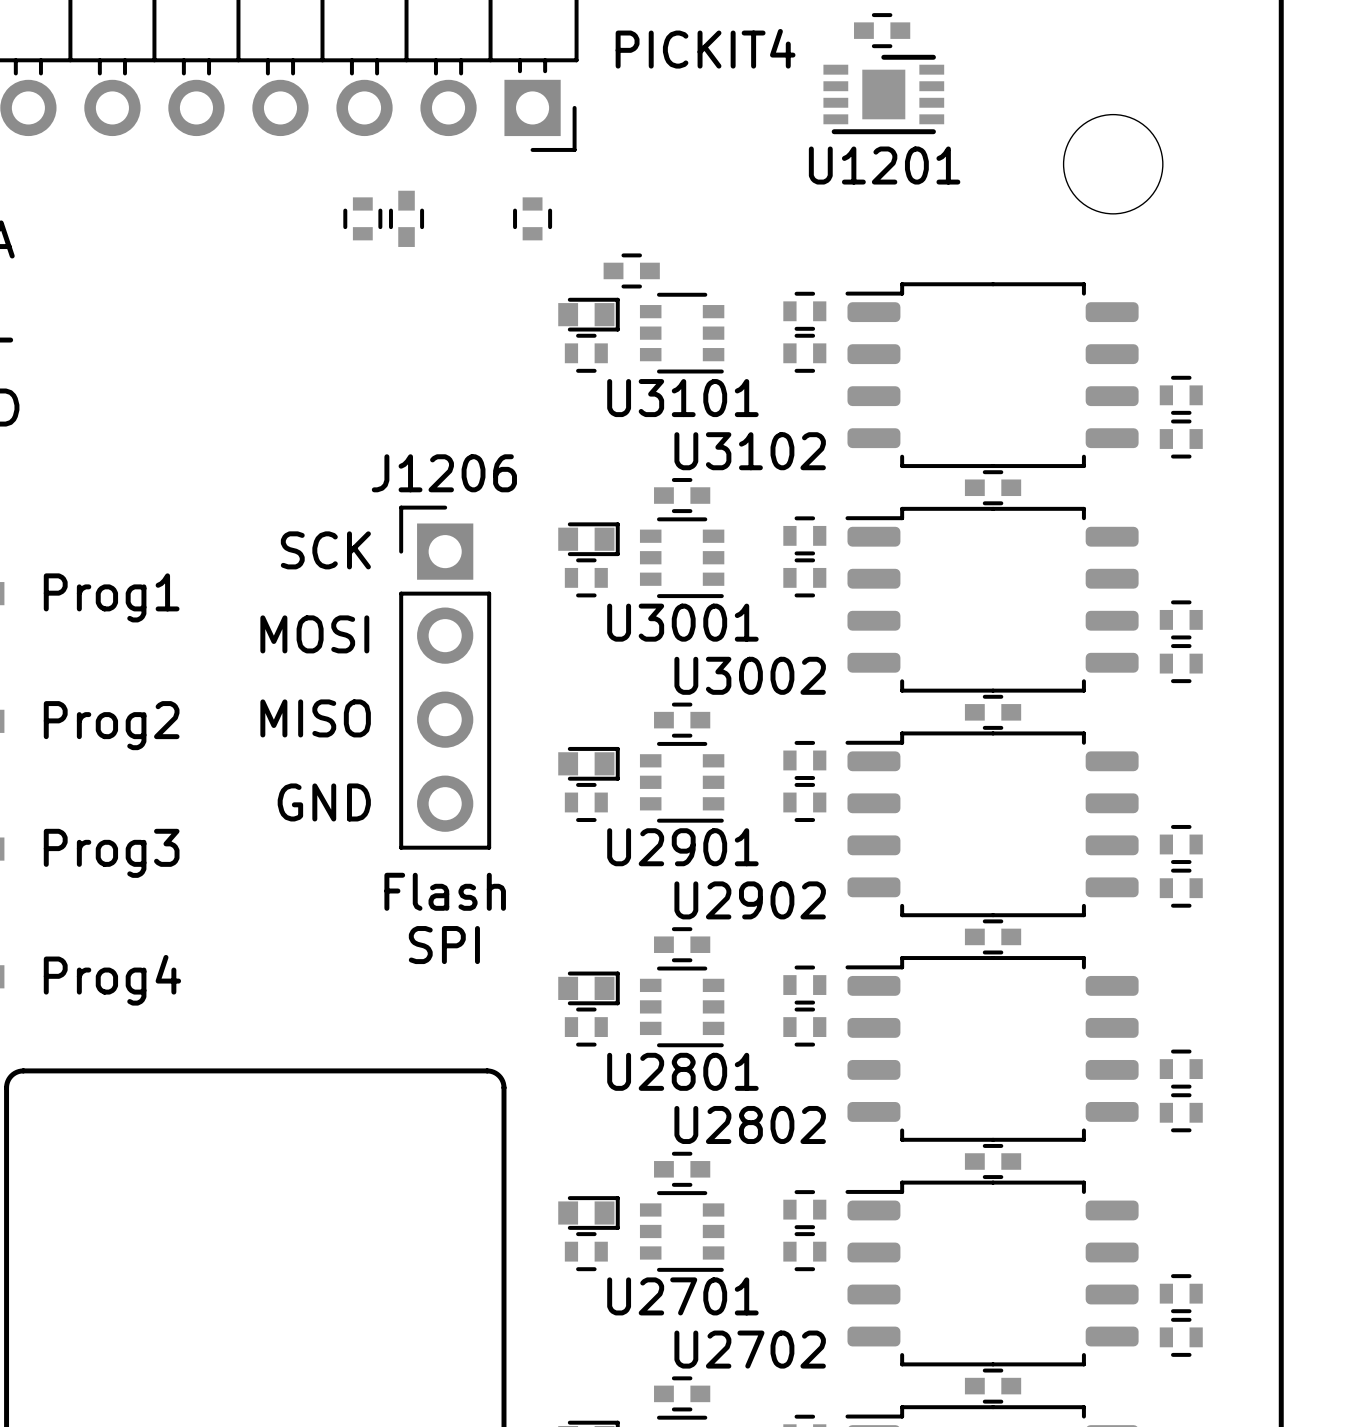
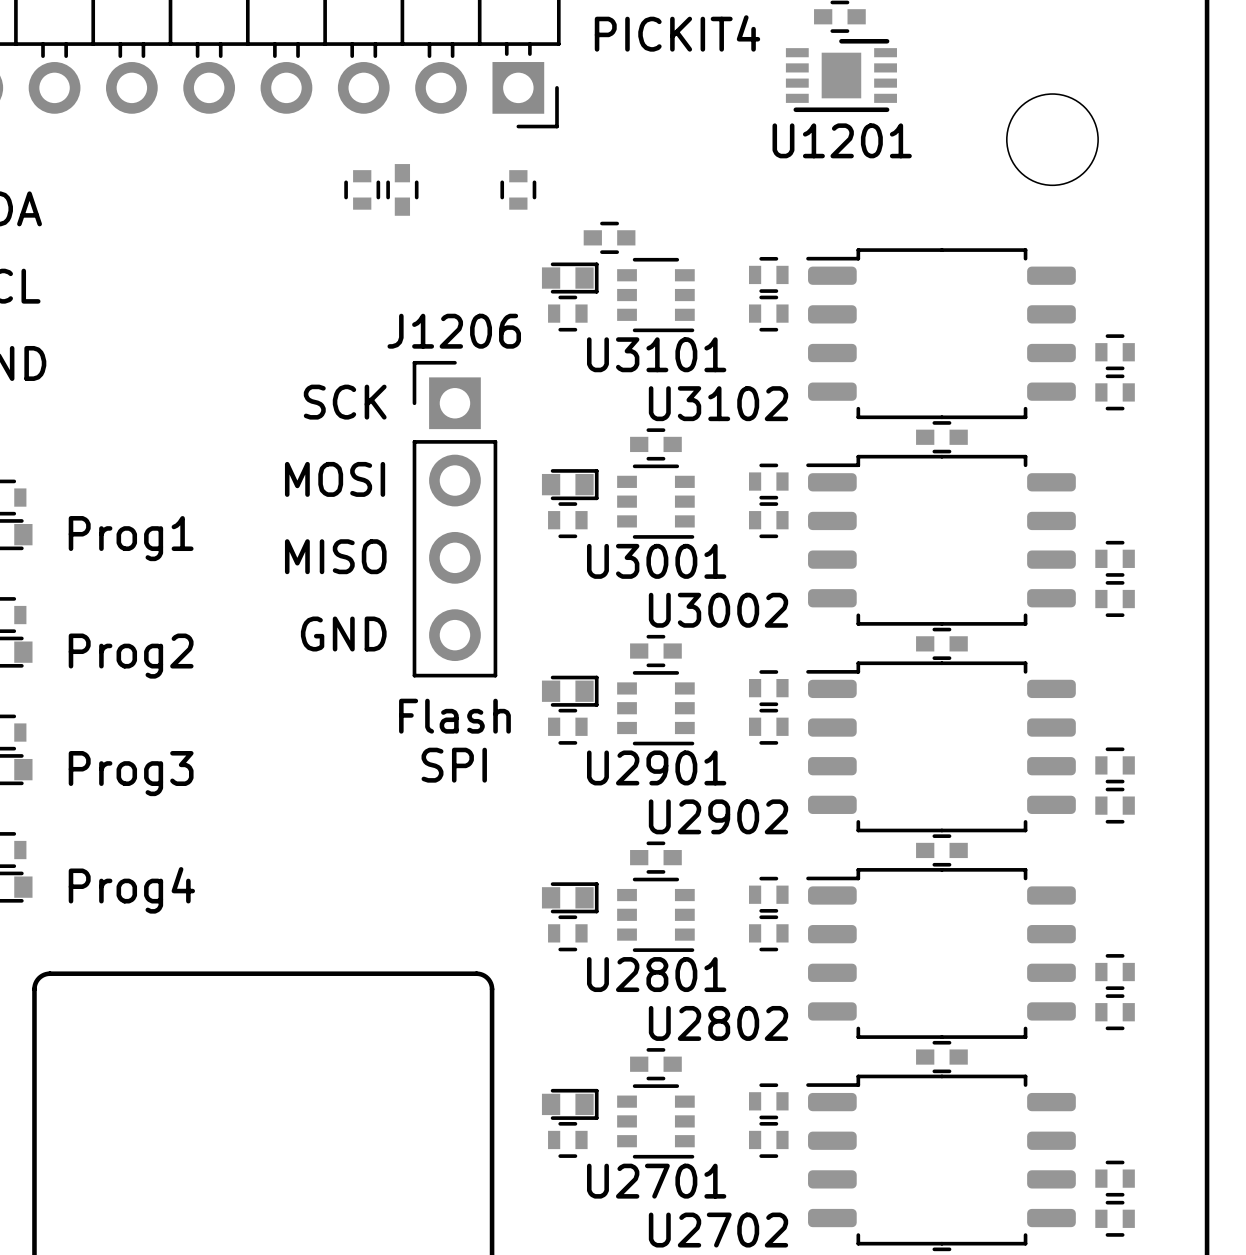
text position: SCK (325, 550) -> SCK (345, 402)
text position: MOSI (314, 634) -> MOSI (335, 479)
J1206 position: (445, 677) -> (454, 519)
text position: MISO (315, 718) -> MISO (335, 556)
text position: GND (324, 802) -> GND (343, 634)
text position: Flash (445, 891) -> Flash (454, 716)
text position: SPI (444, 945) -> SPI (454, 765)

